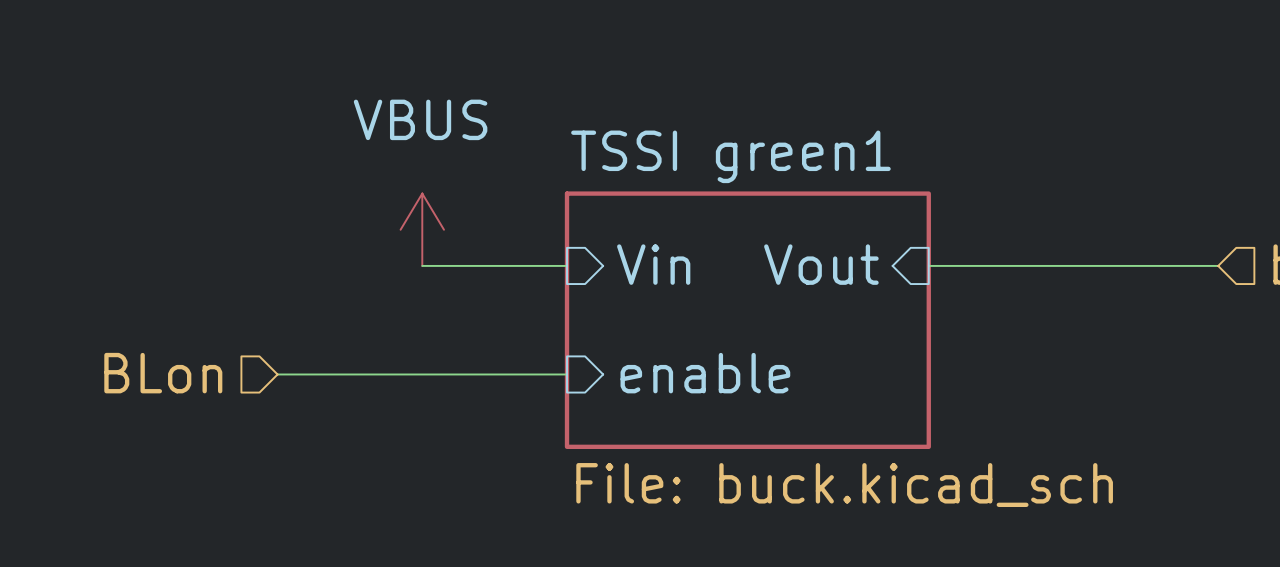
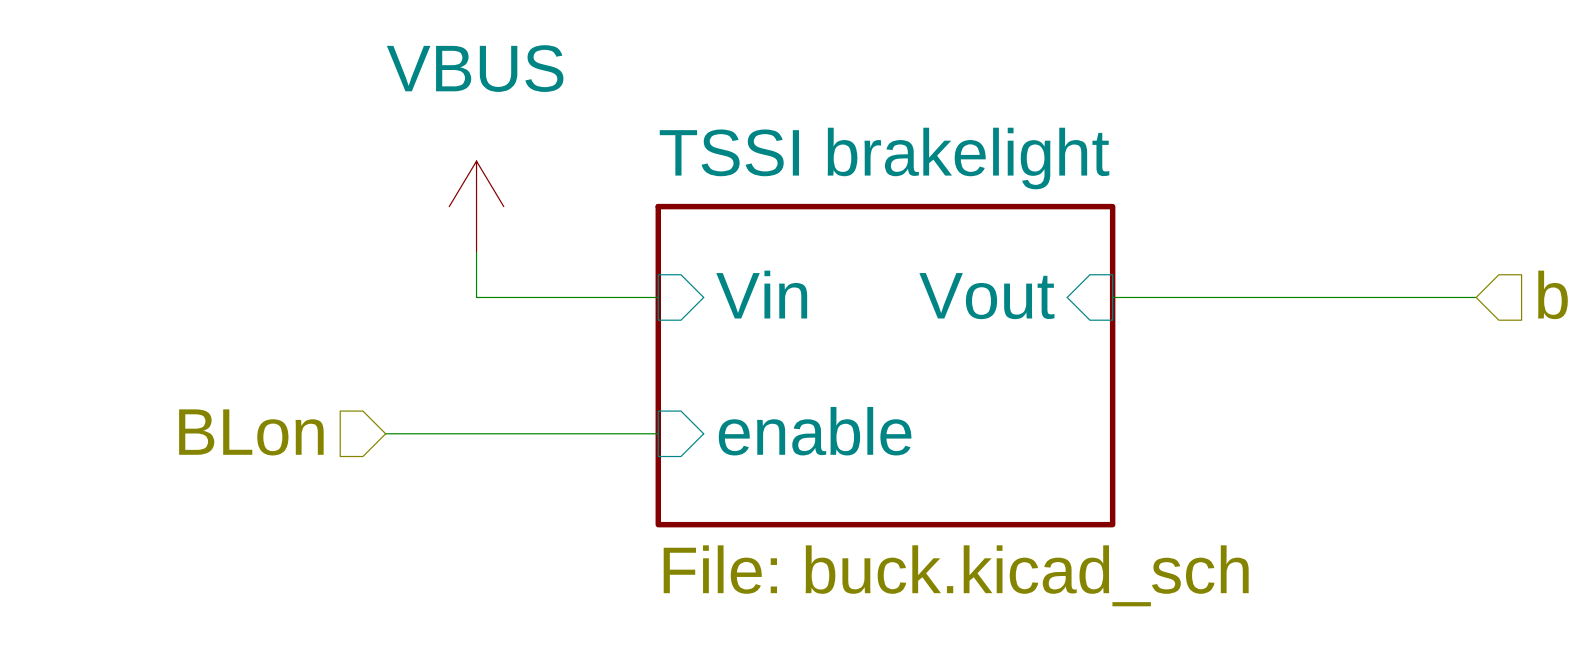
sheet TSSI green1 name: TSSI green1 (730, 156) -> TSSI brakelight (884, 158)
power symbol position: VBUS (422, 229) -> VBUS (476, 206)
hierarchical label position: BLon (163, 373) -> BLon (251, 432)
wire: (277, 374) (349, 374) -> none

